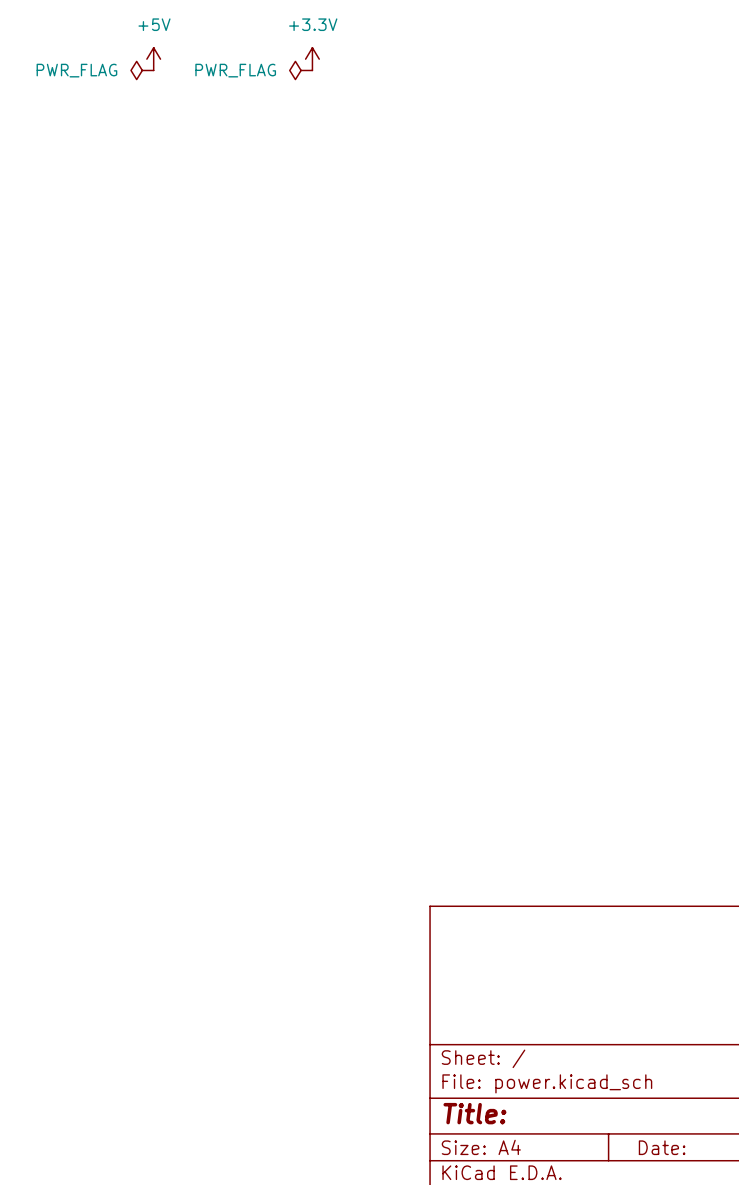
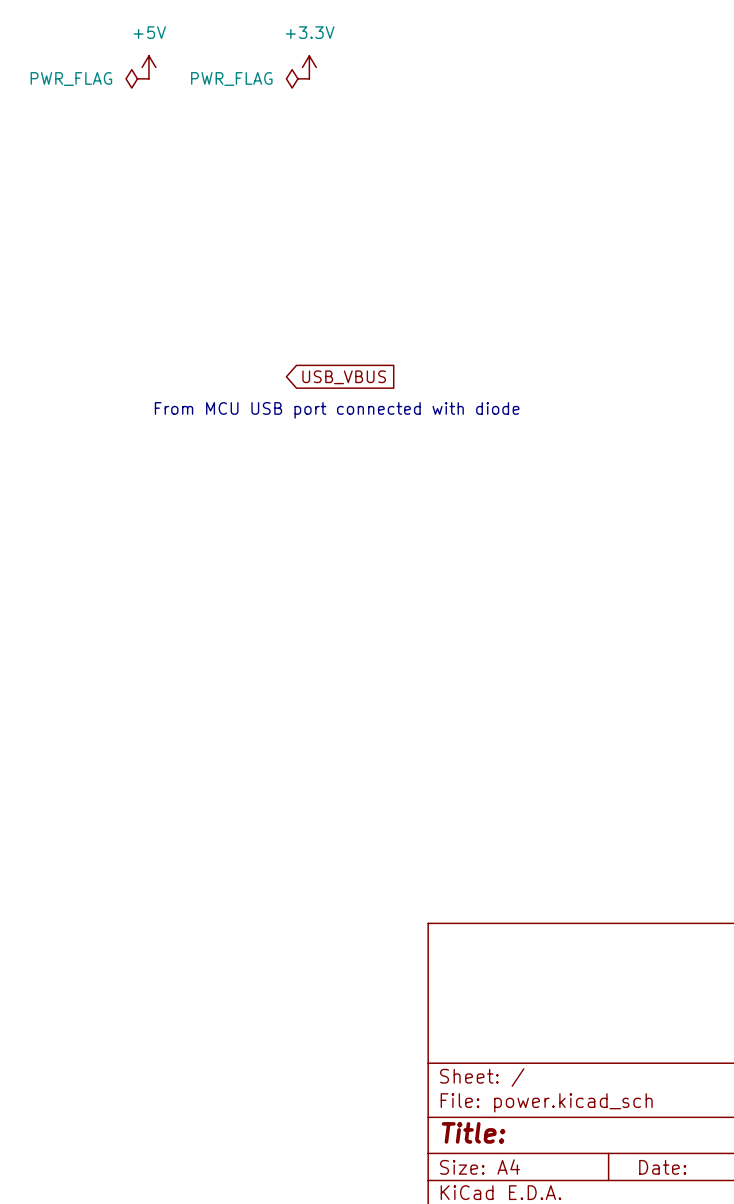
global label: none -> USB_VBUS (344, 377)
text: none -> From MCU USB port connected with diode (337, 410)

